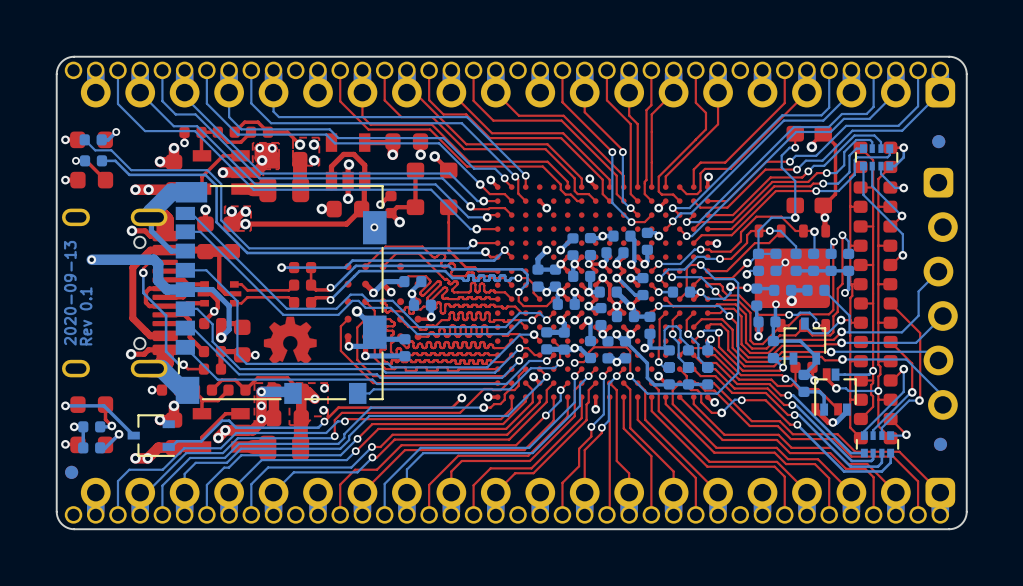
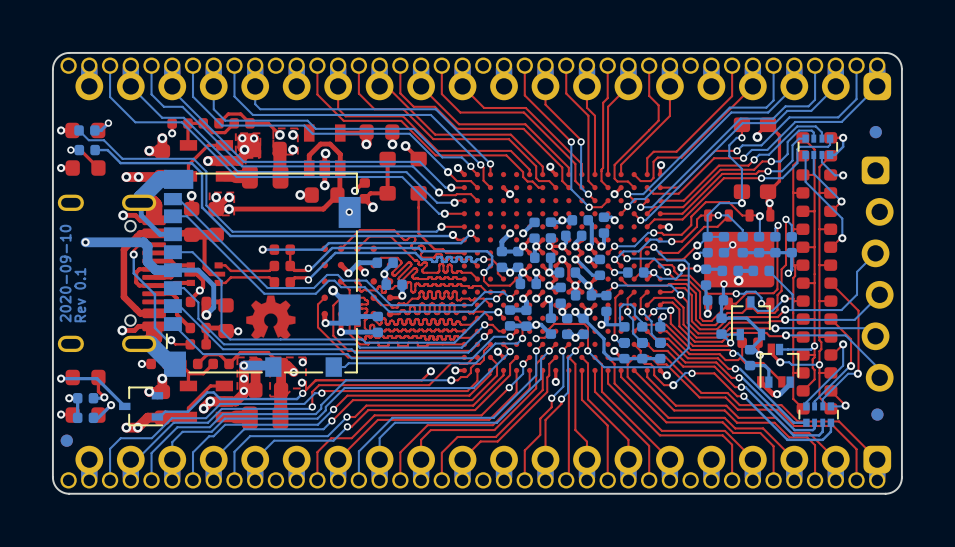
text: 2020-09-13 (70, 293) -> 2020-09-10 (65, 273)

